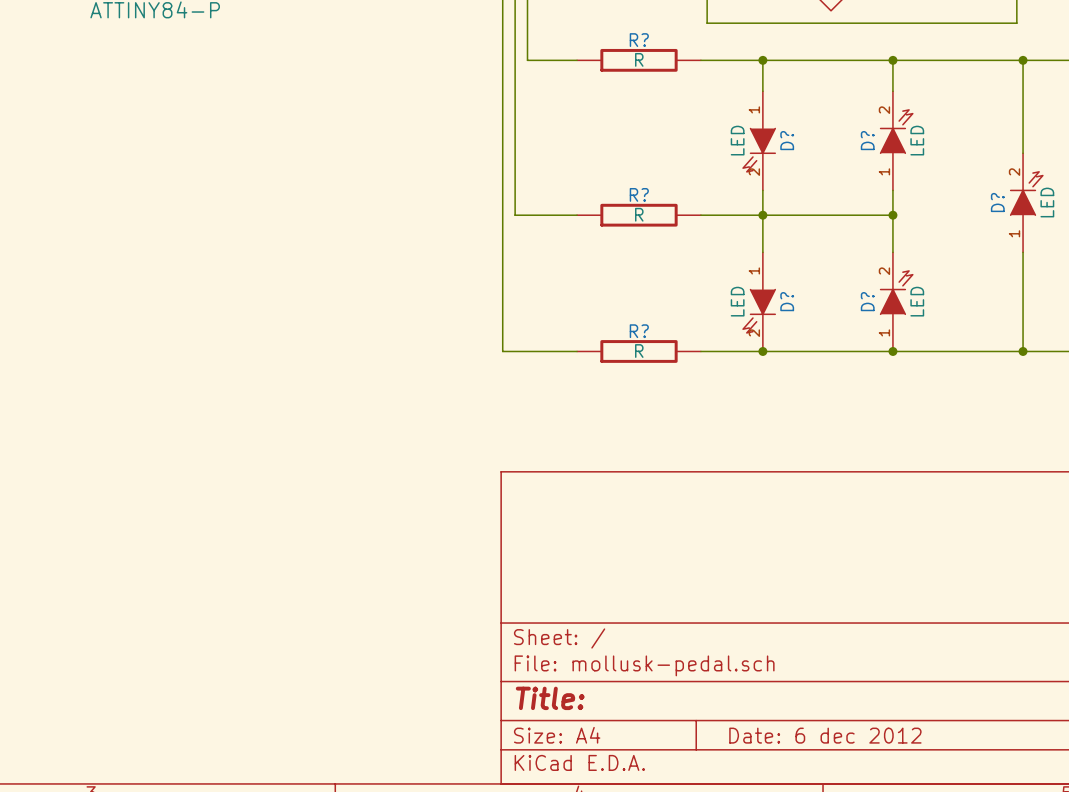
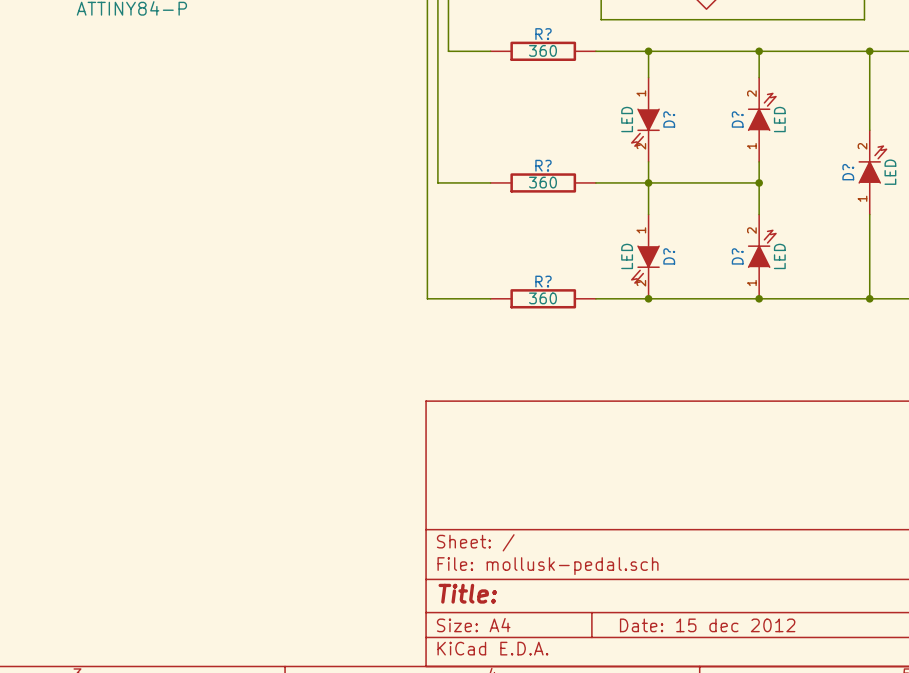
R? value: R (639, 59) -> 360 (542, 50)
R? value: R (639, 214) -> 360 (542, 182)
R? value: R (639, 351) -> 360 (542, 298)
title block: Date: 6 dec 2012 (825, 735) -> Date: 15 dec 2012 (707, 625)

